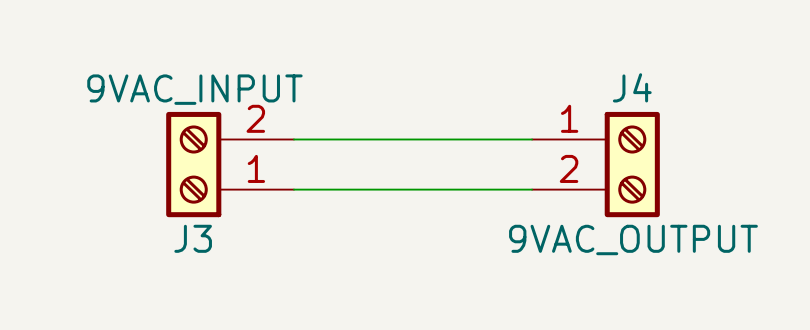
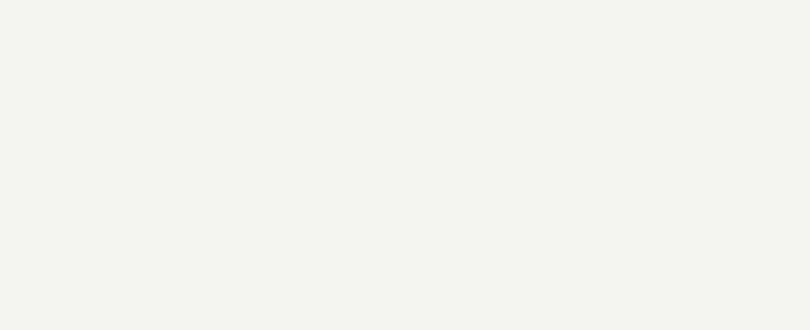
wire: (293, 139) (532, 139) -> none
J3: 9VAC_INPUT (230, 164) -> none
J4: 9VAC_OUTPUT (595, 164) -> none
wire: (293, 189) (532, 189) -> none

